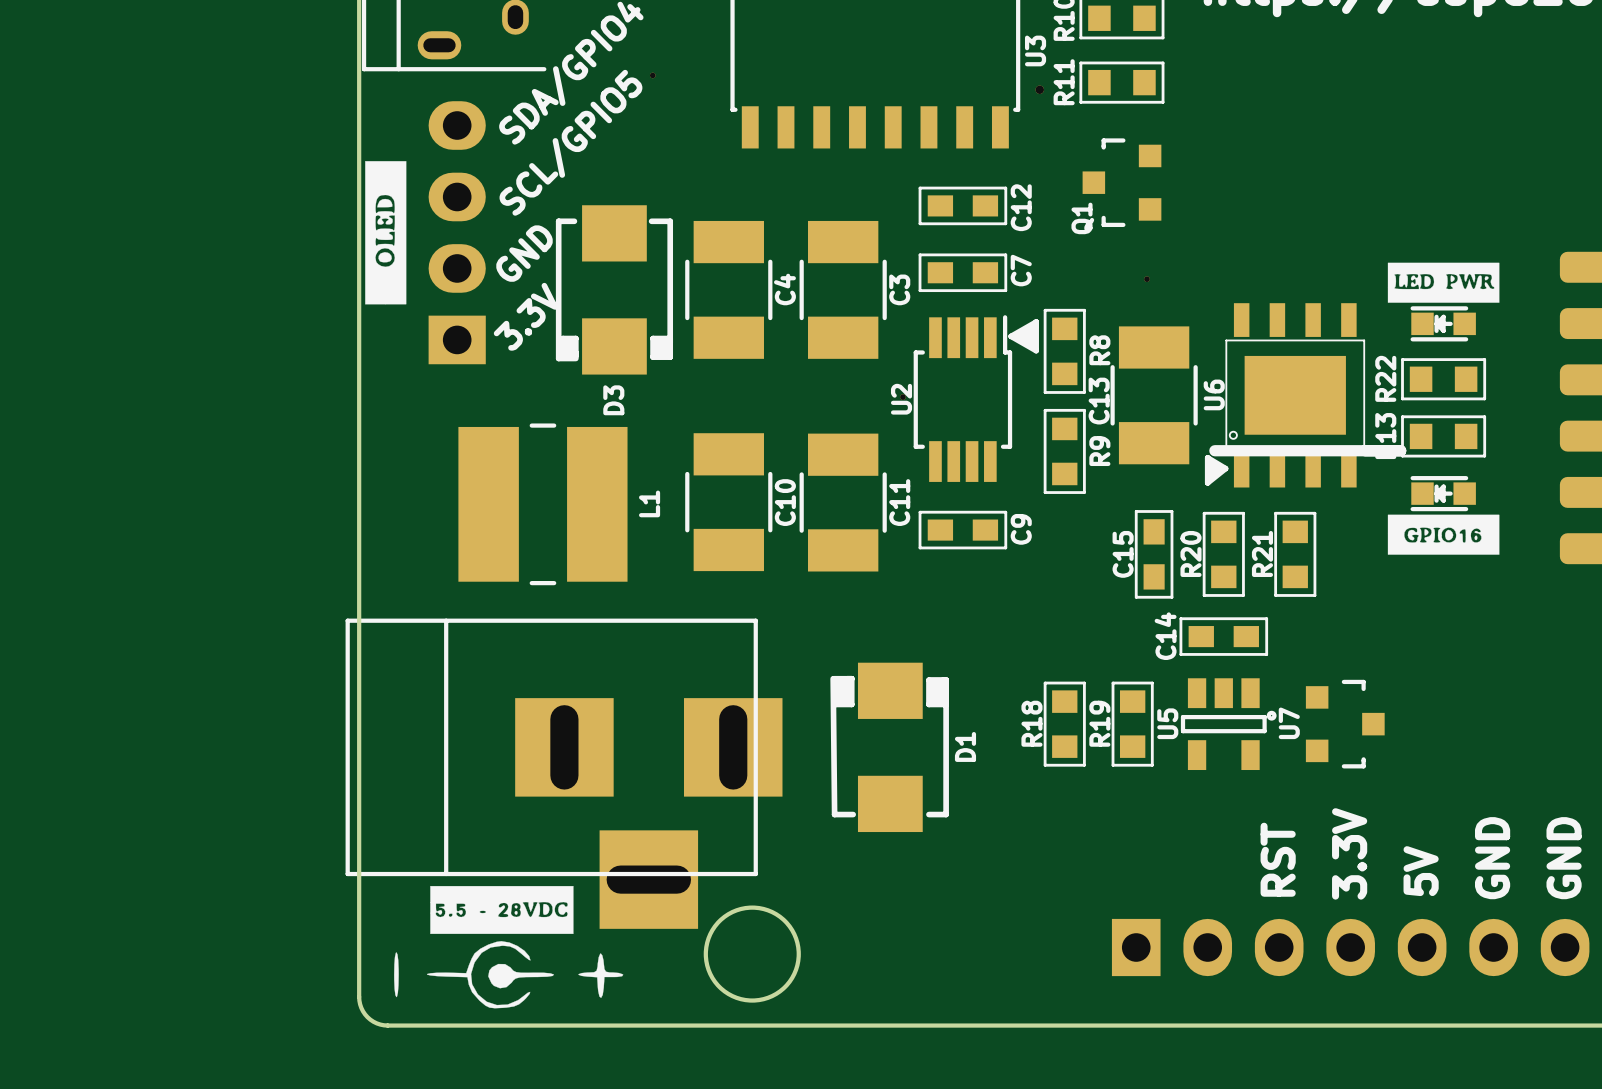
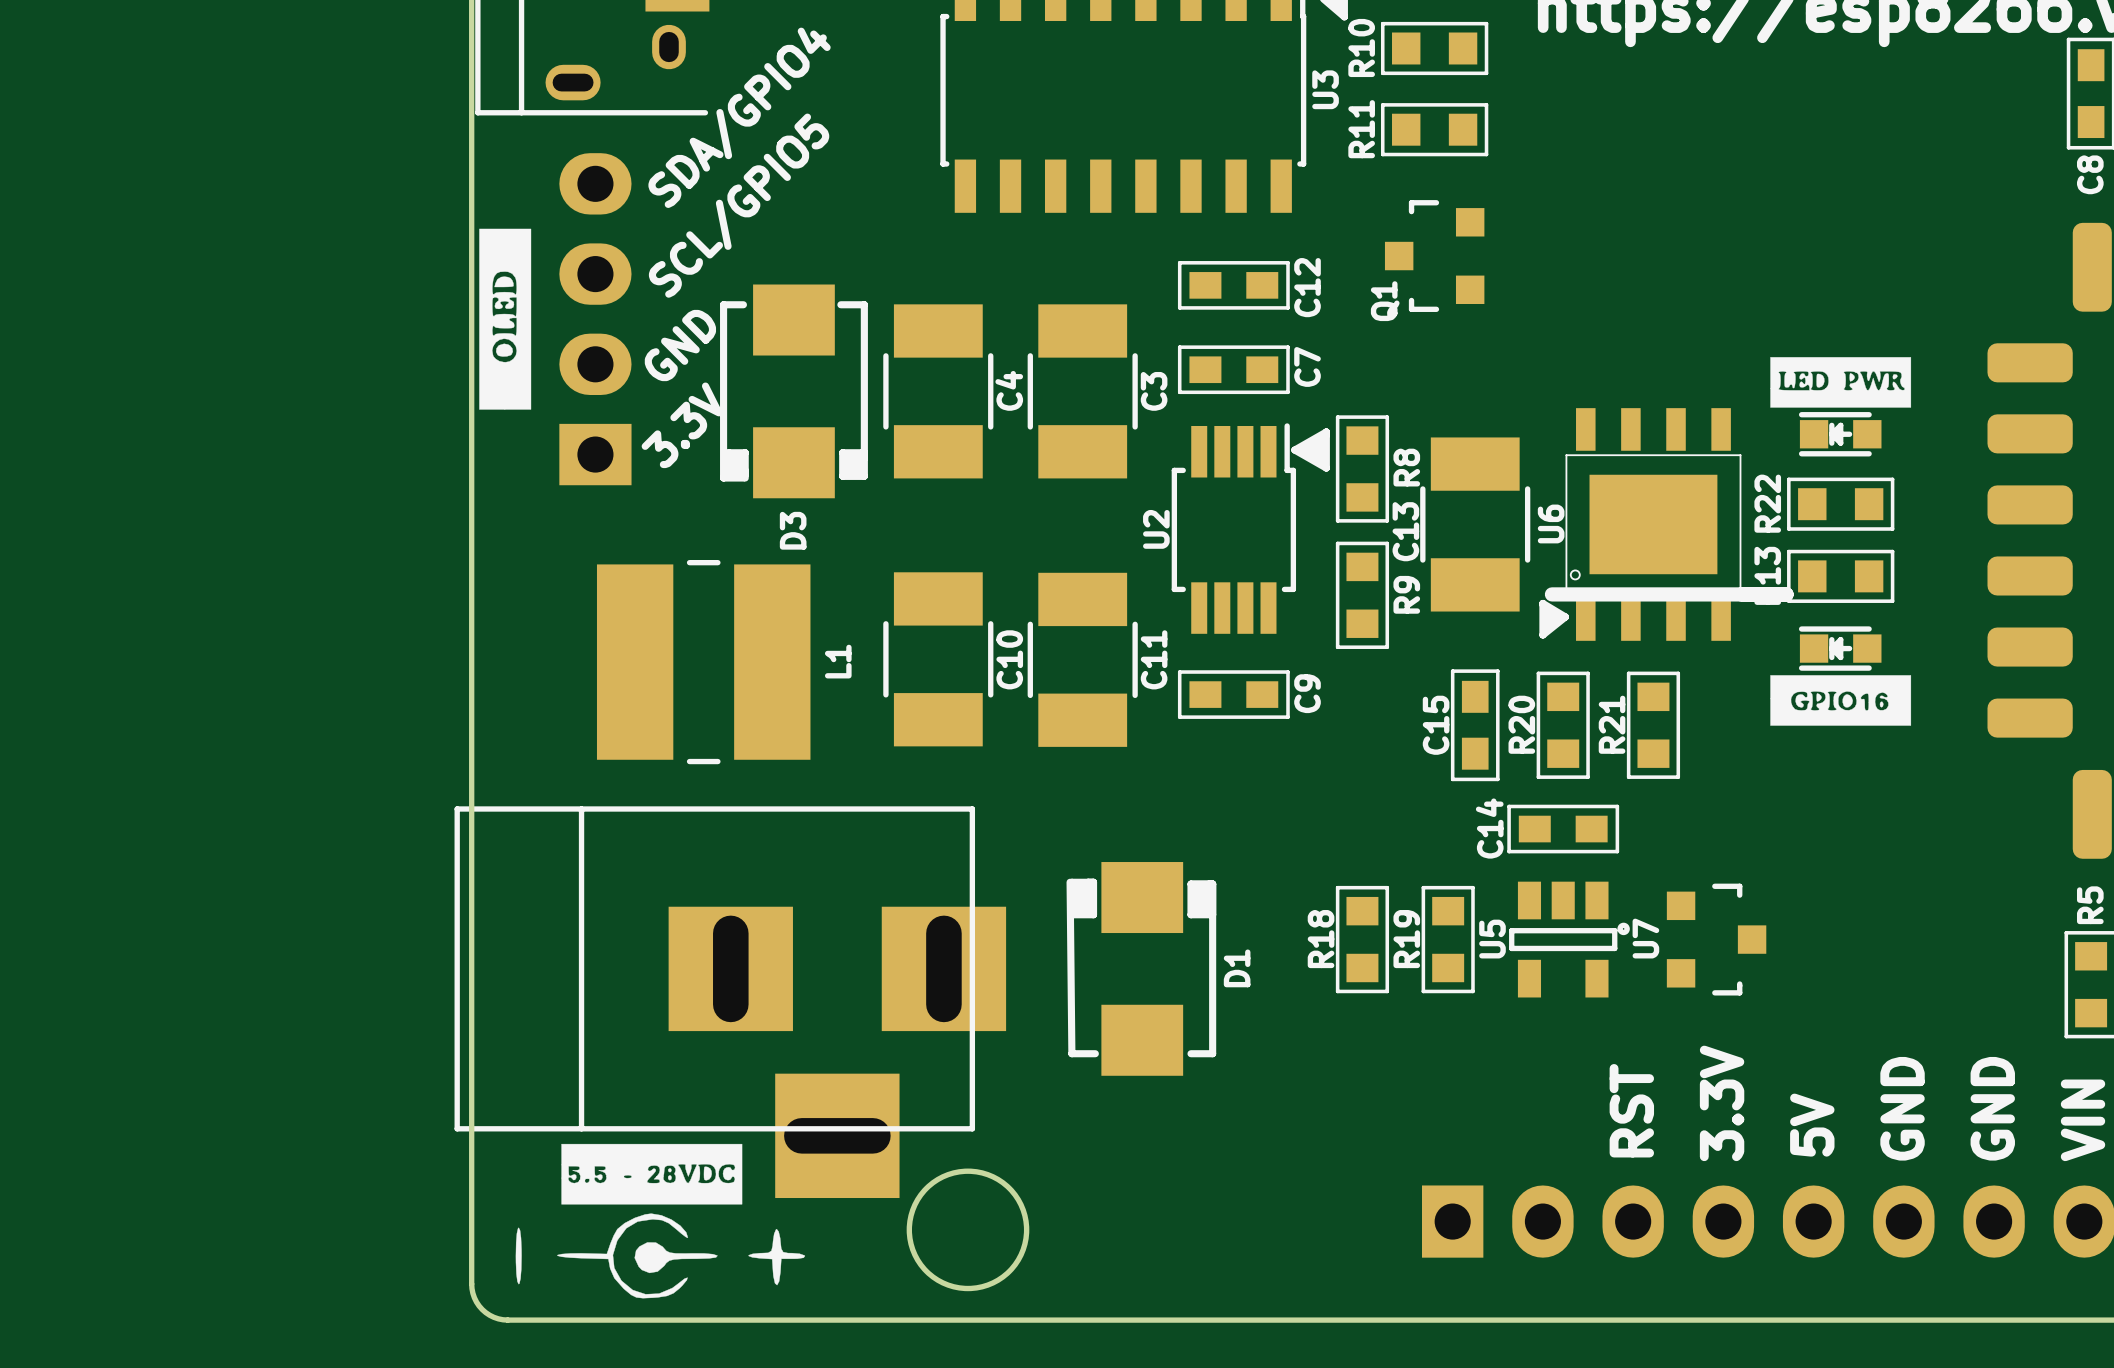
part: (652, 75) -> none
part: (1039, 89) -> none
part: (1146, 279) -> none
part: (902, 397) -> none

